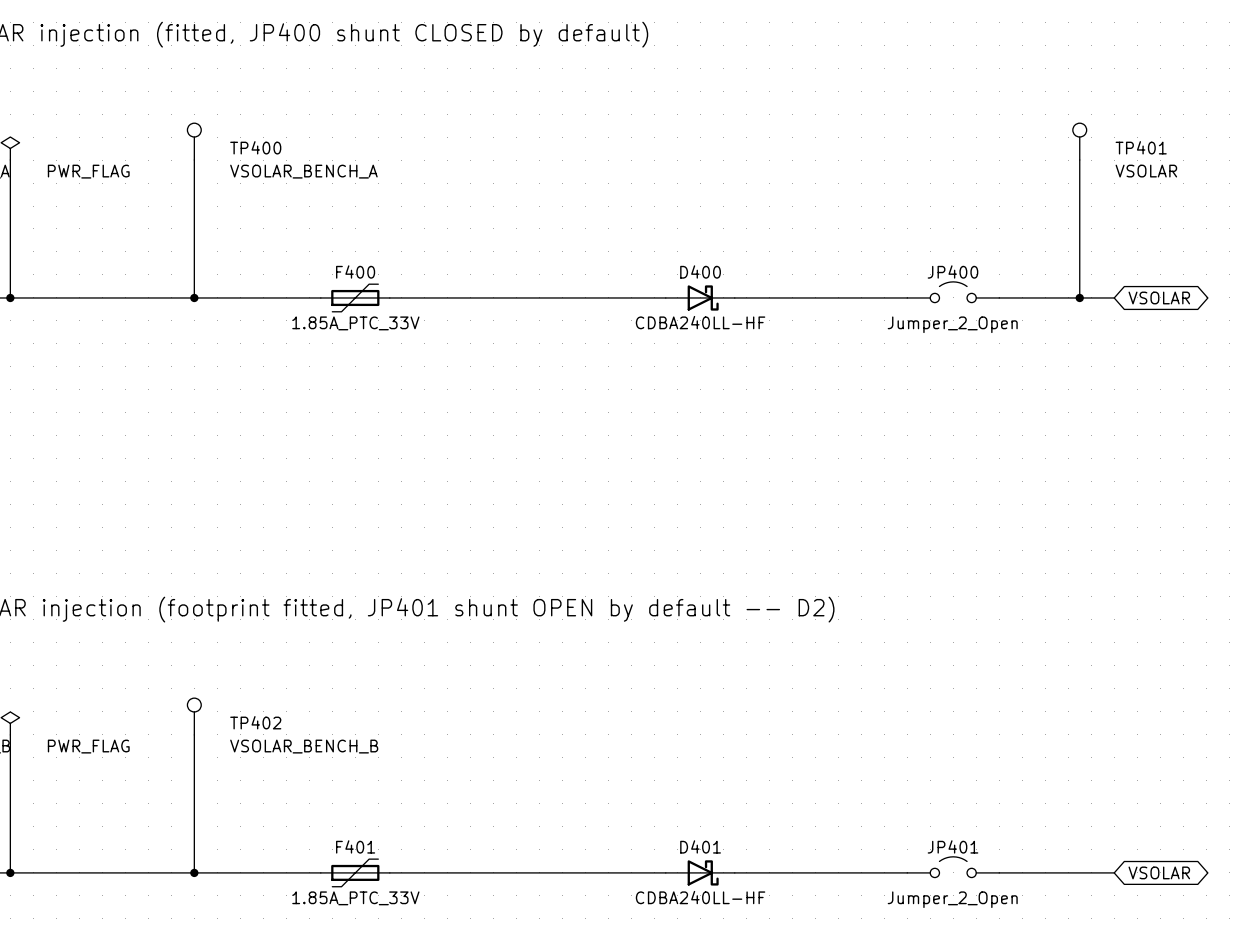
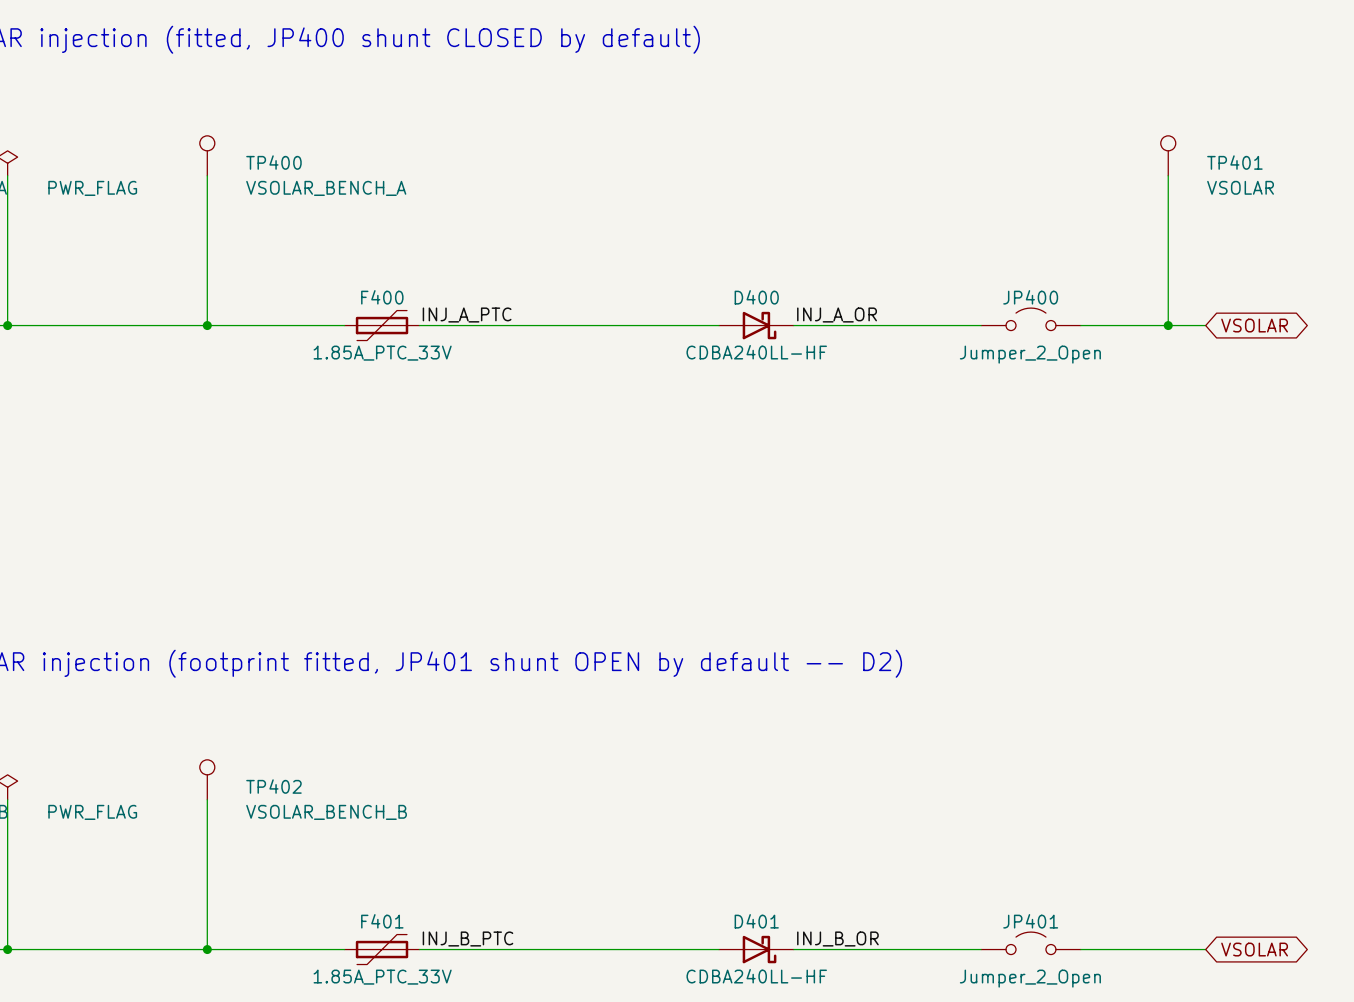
label: none -> INJ_A_PTC (467, 315)
label: none -> INJ_A_OR (837, 315)
label: none -> INJ_B_PTC (467, 939)
label: none -> INJ_B_OR (837, 939)

